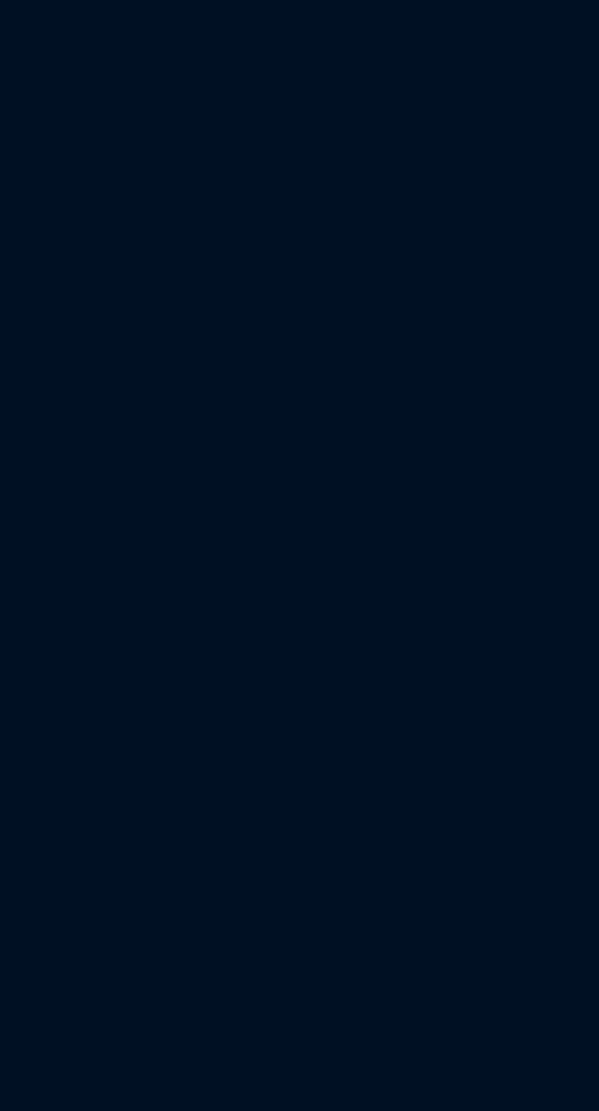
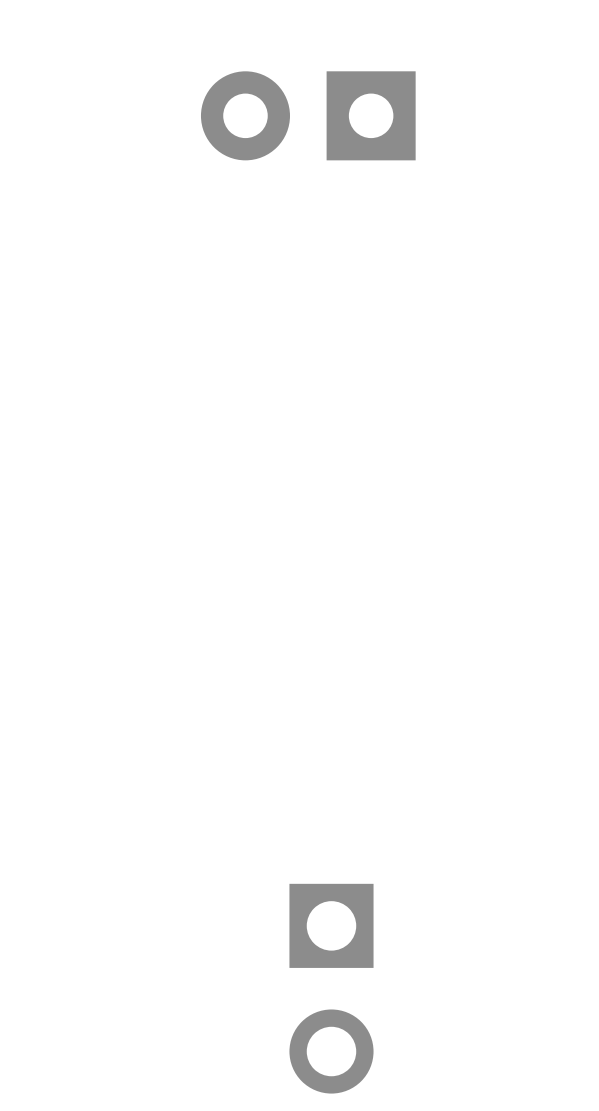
part: none -> (308, 115)
part: none -> (331, 988)

